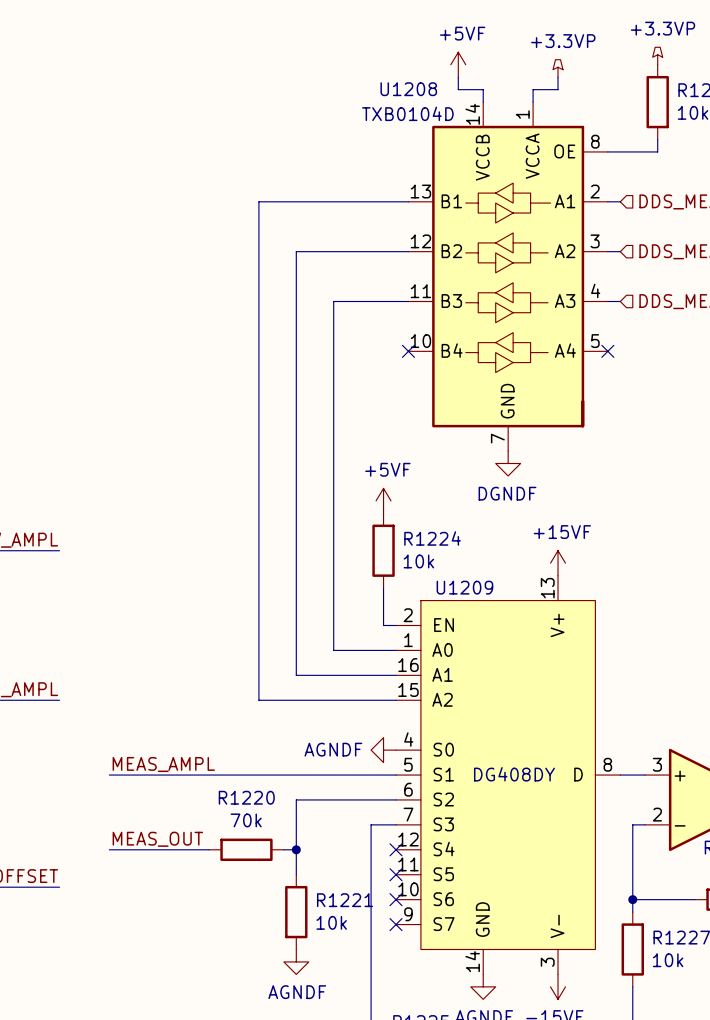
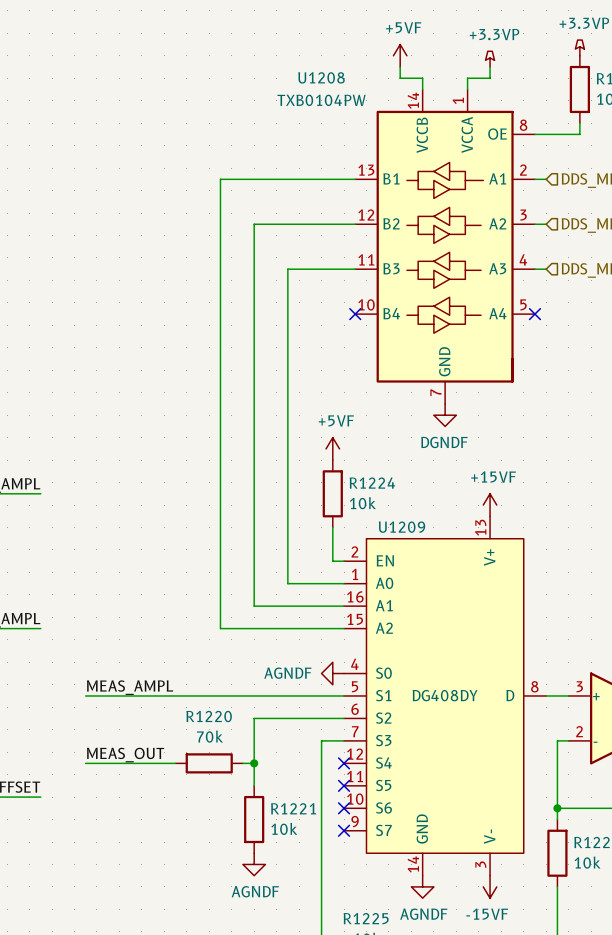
U1208 name position: U1208 (408, 89) -> U1208 (321, 77)
U1208 value: TXB0104D (407, 113) -> TXB0104PW (321, 100)

